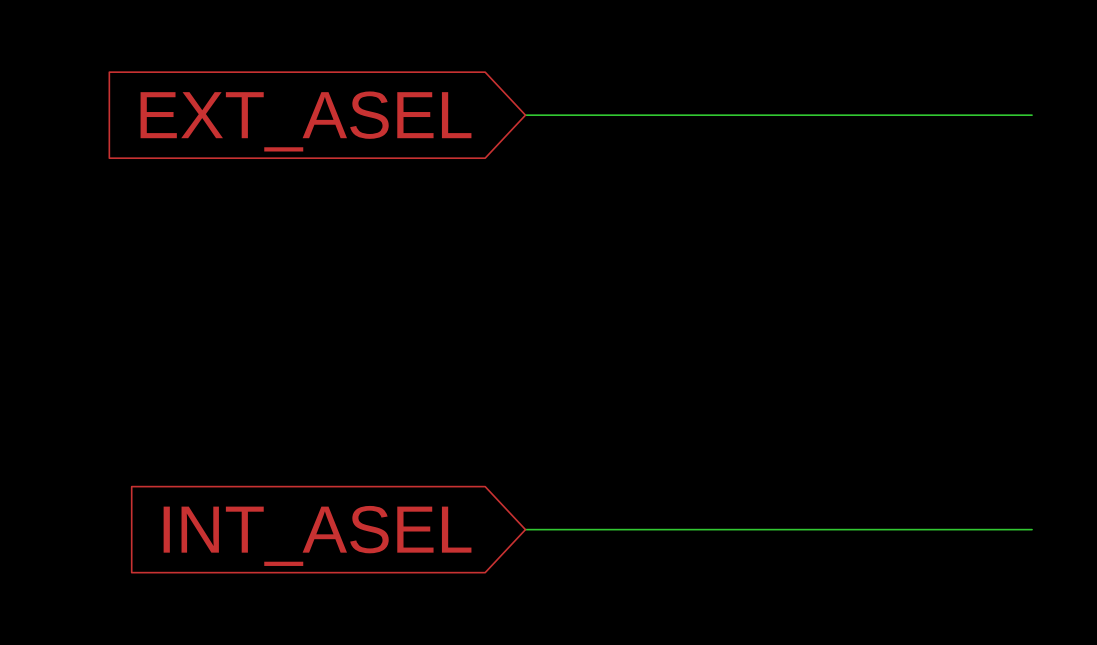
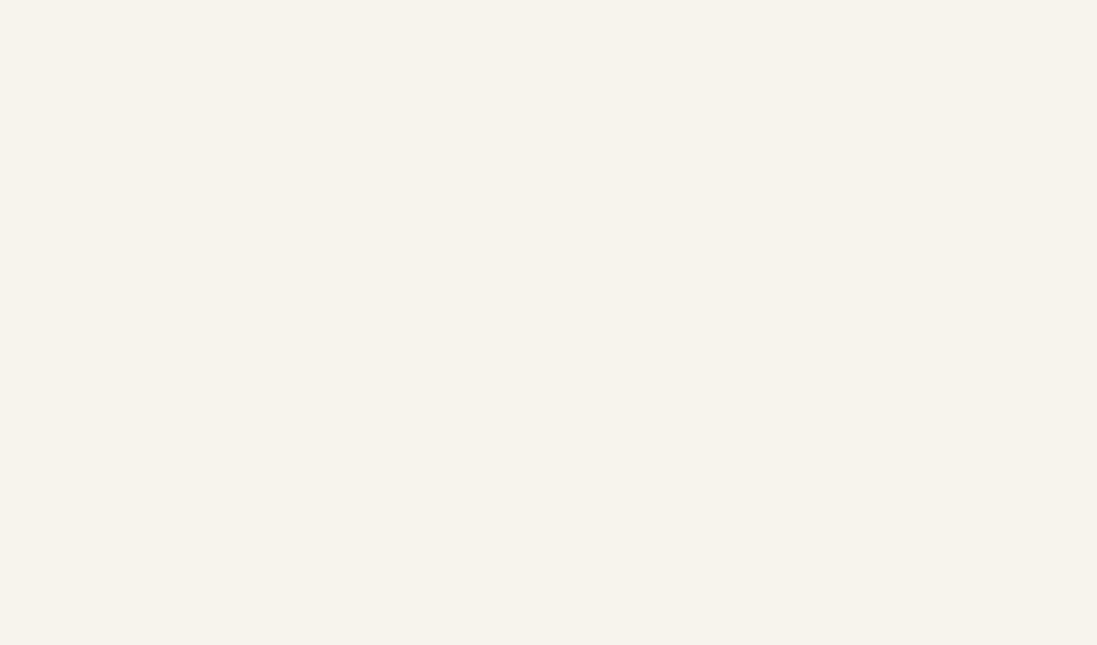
wire: (525, 115) (1032, 115) -> none
global label: EXT_ASEL (306, 121) -> none
wire: (525, 529) (1032, 529) -> none
global label: INT_ASEL (317, 535) -> none

